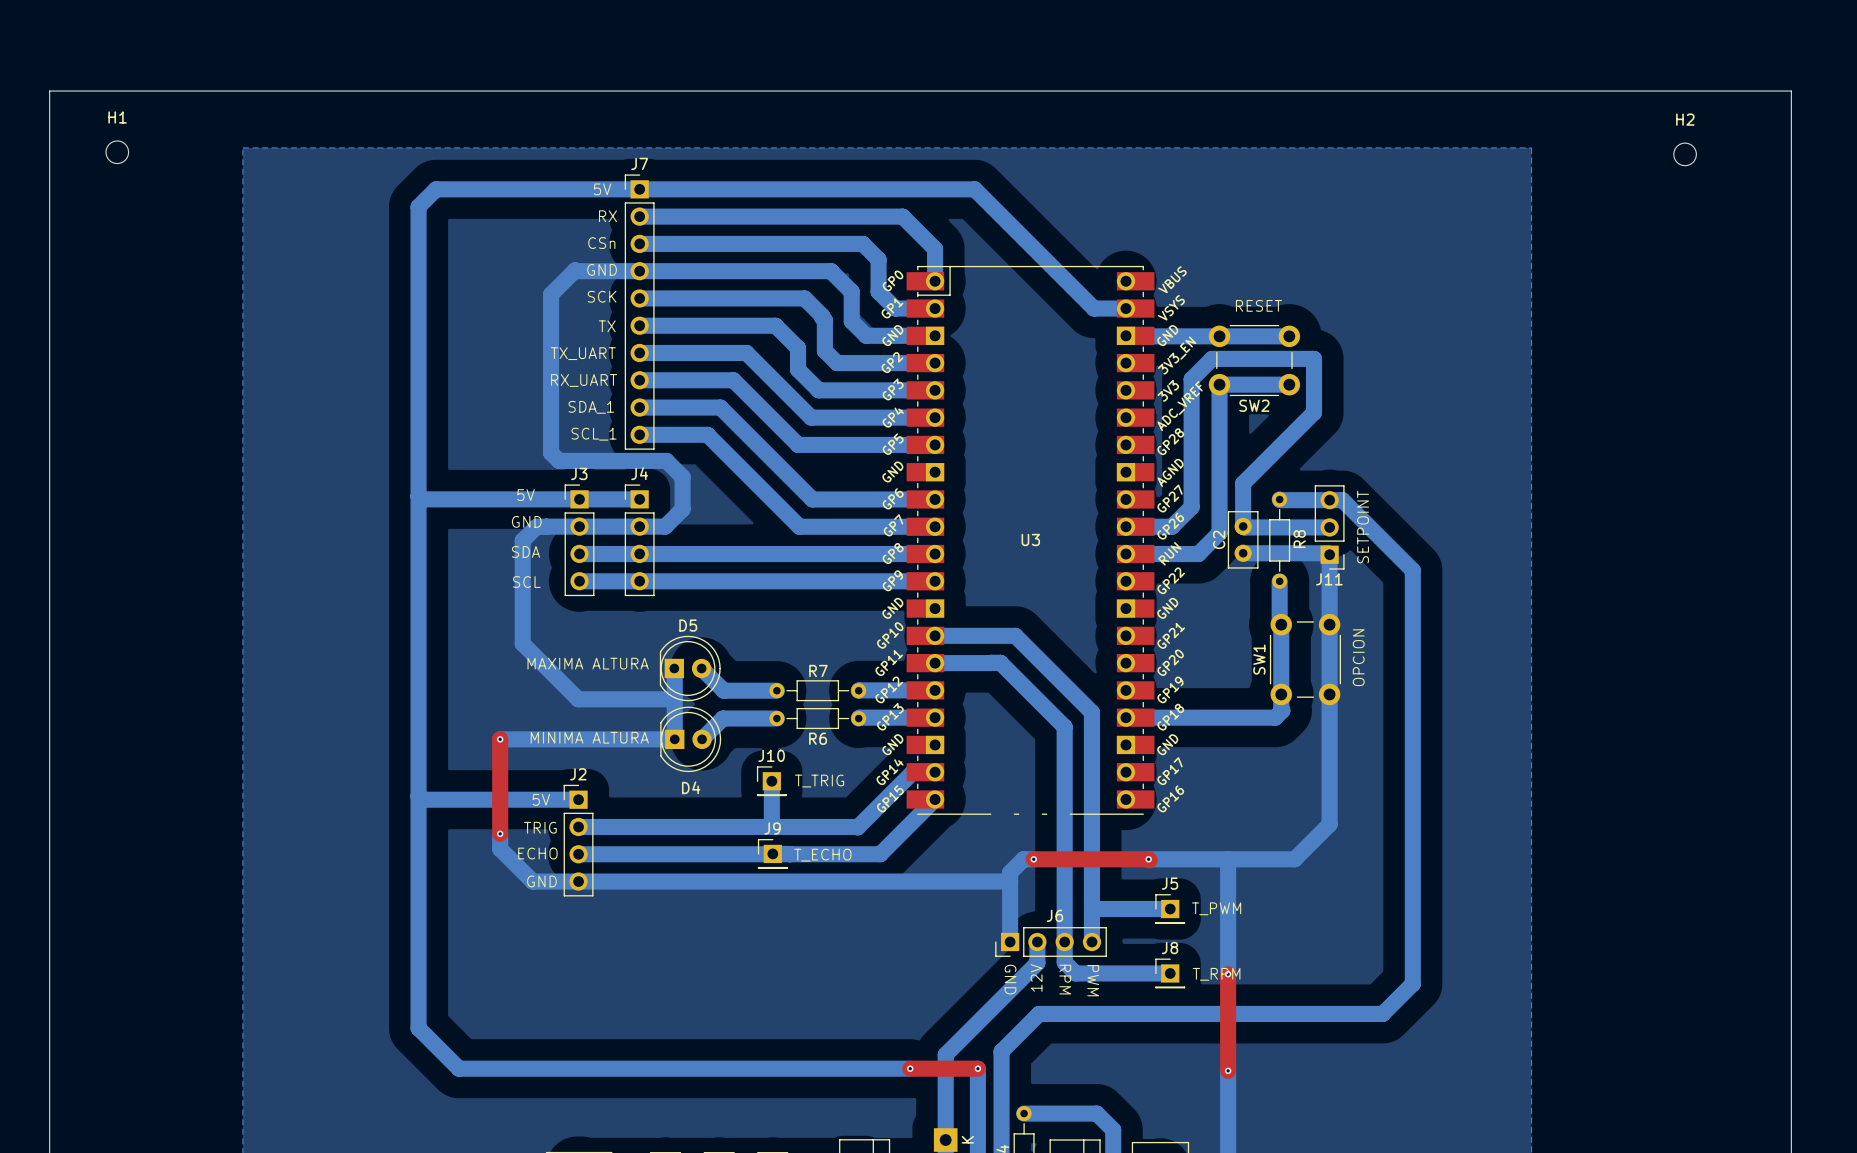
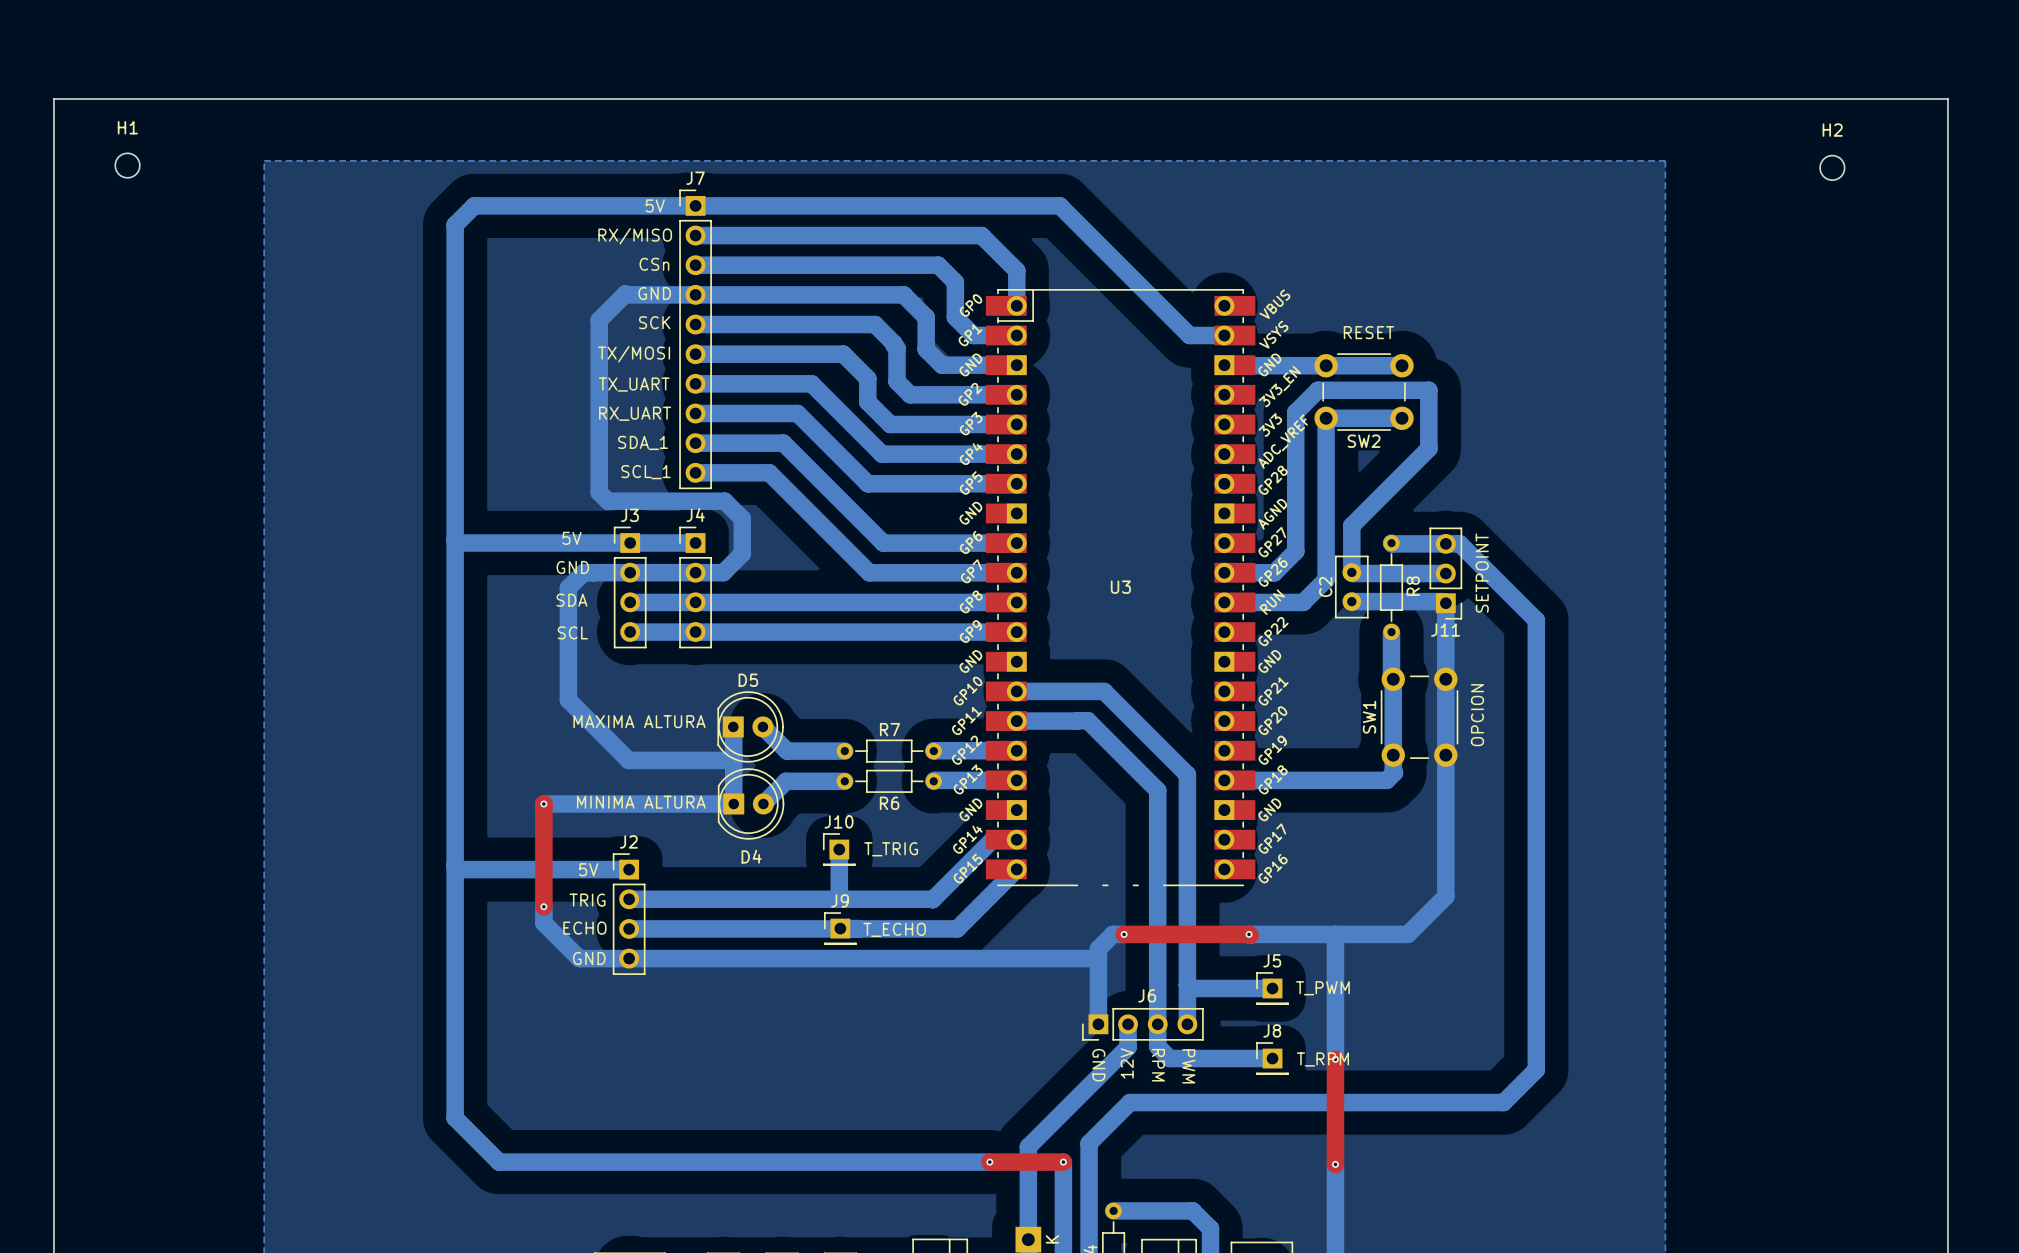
text: RX (607, 216) -> none
text: none -> RX/MISO (635, 236)
text: none -> TX/MOSI (634, 354)
text: TX (607, 326) -> none

